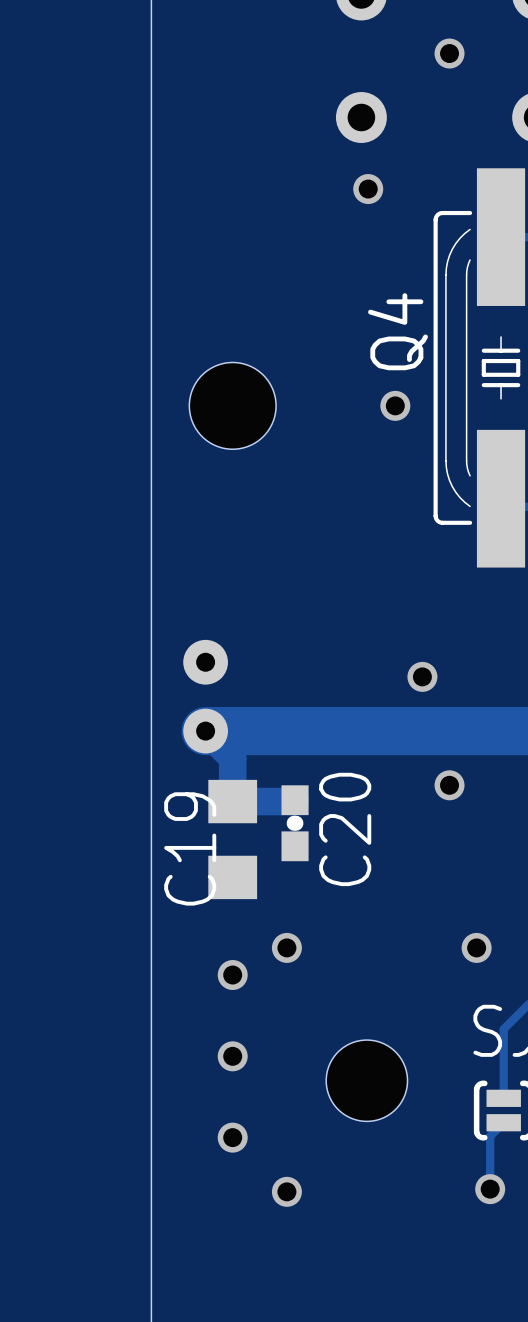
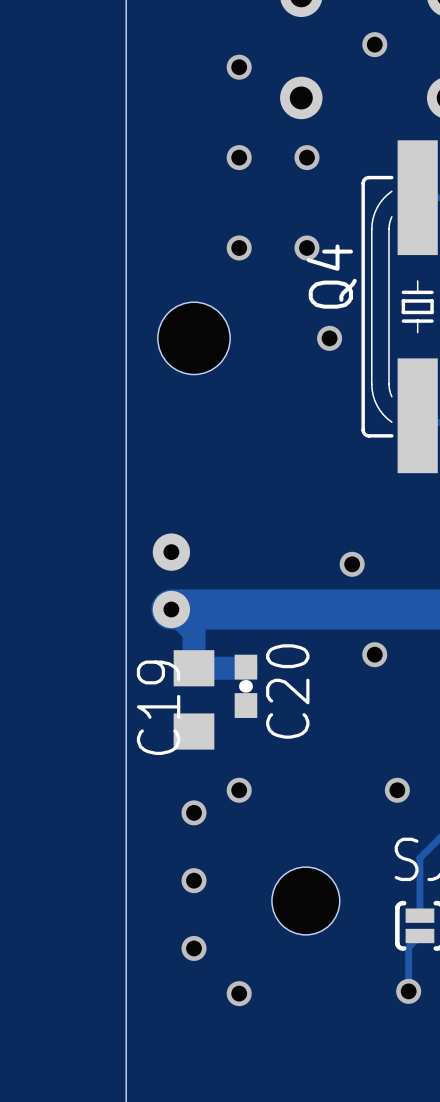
via: none -> (239, 67)
via: none -> (239, 157)
via: none -> (239, 247)
via: none -> (306, 247)

